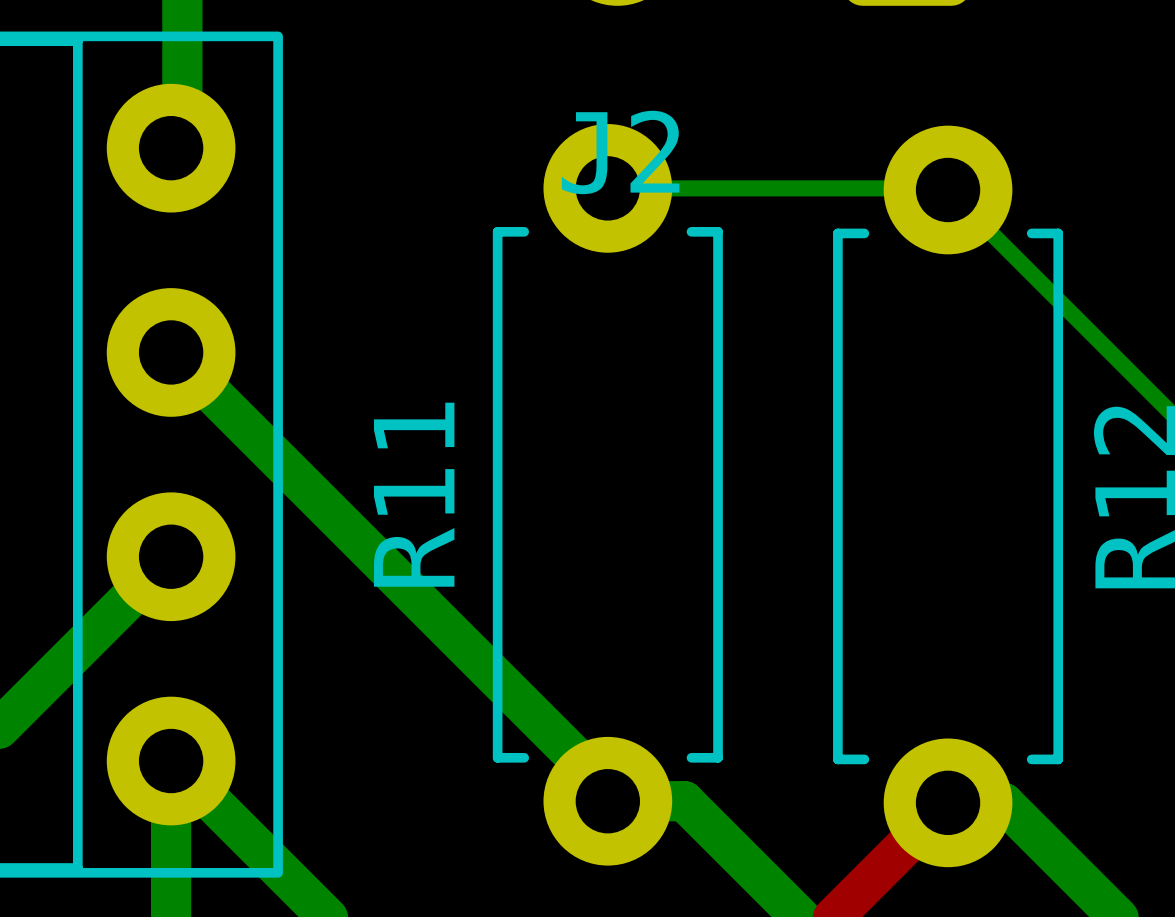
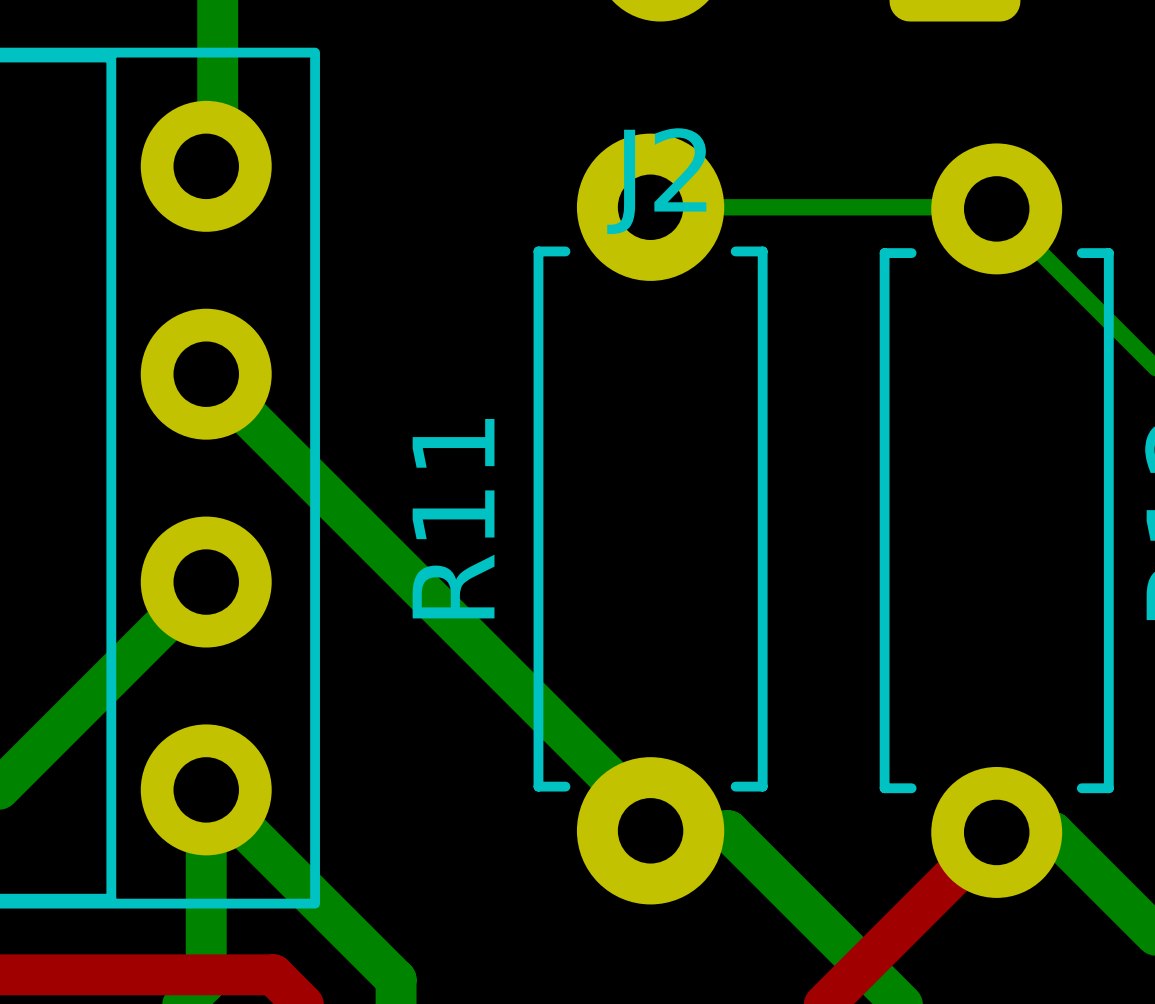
R11 footprint: [492, 124, 723, 866] -> [533, 133, 768, 905]

